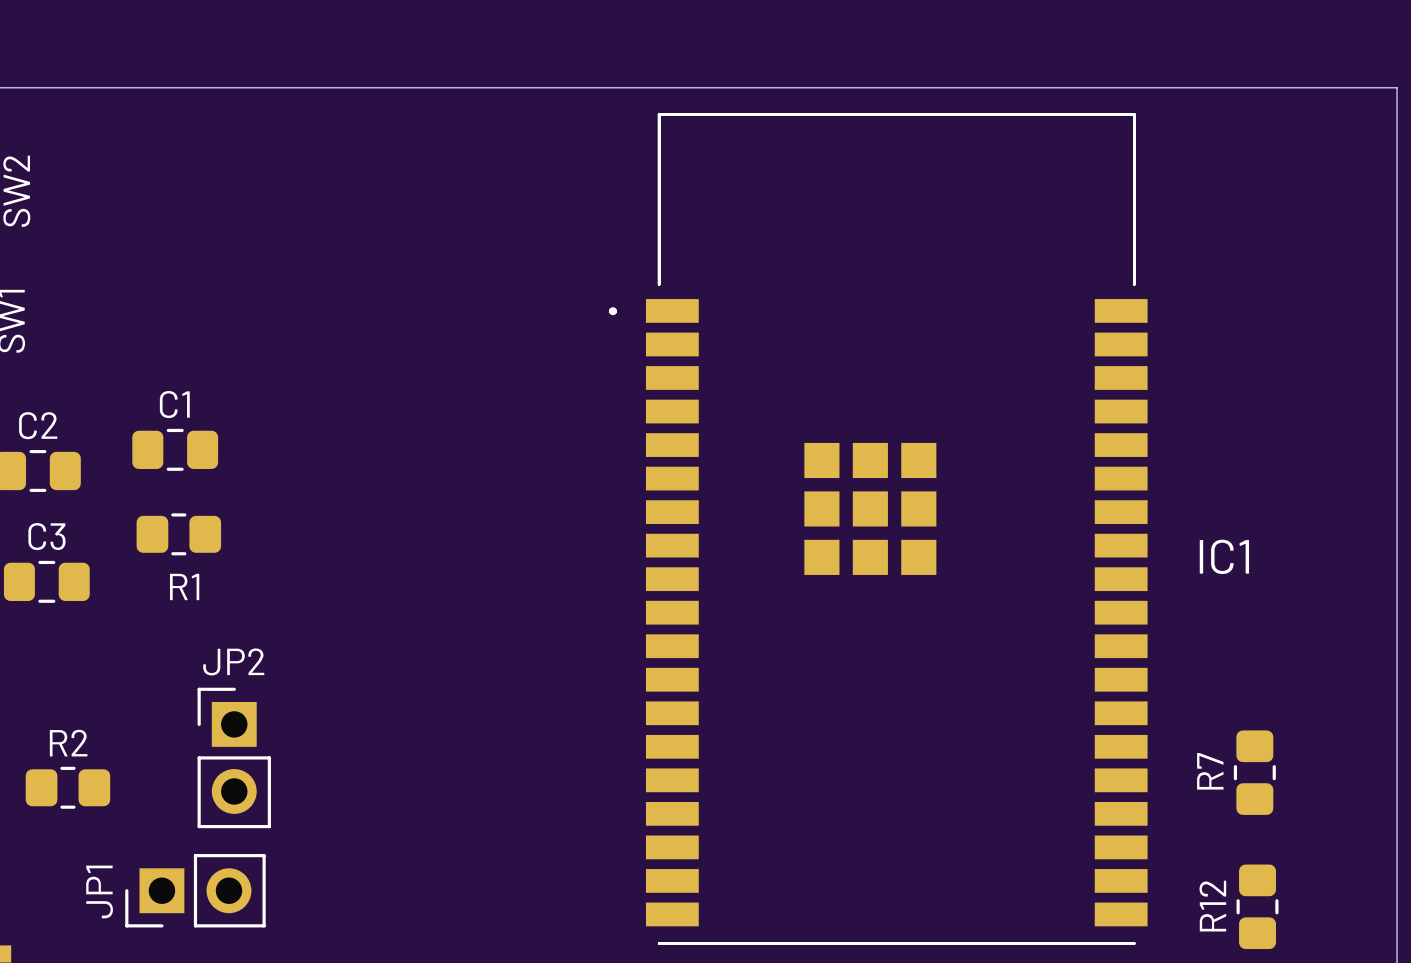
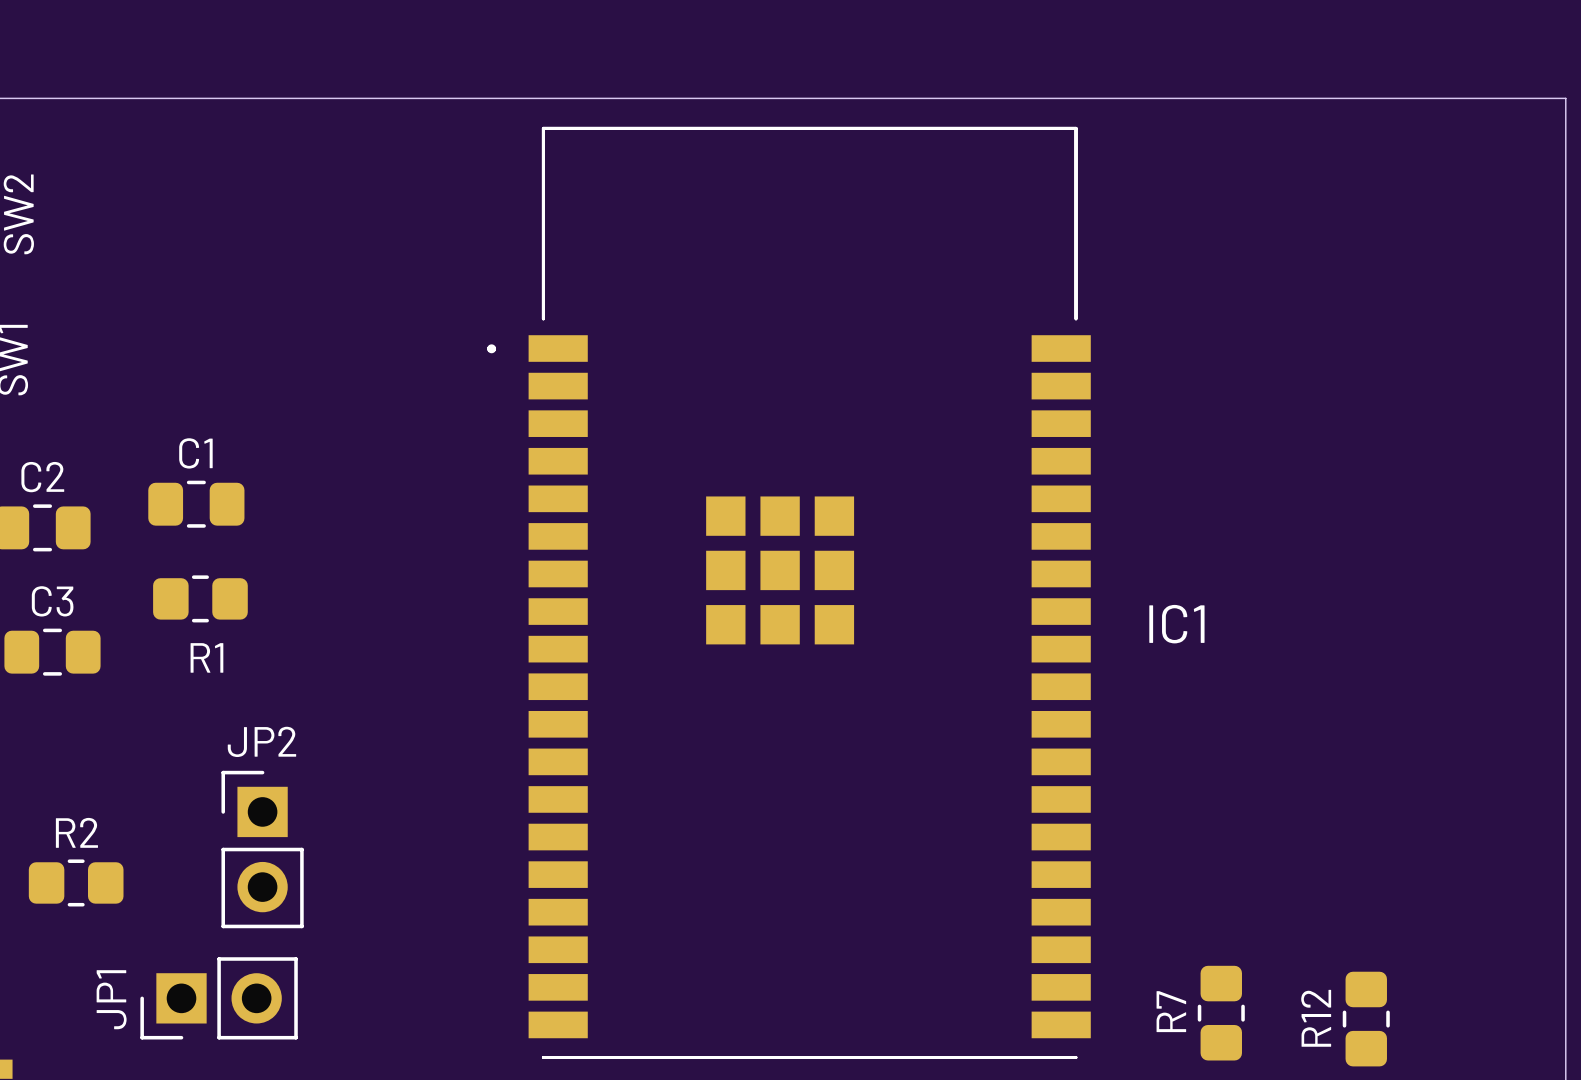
IC1 position: (878, 529) -> (788, 592)
R7 position: (1254, 772) -> (1221, 1013)
R12 position: (1257, 906) -> (1366, 1019)

